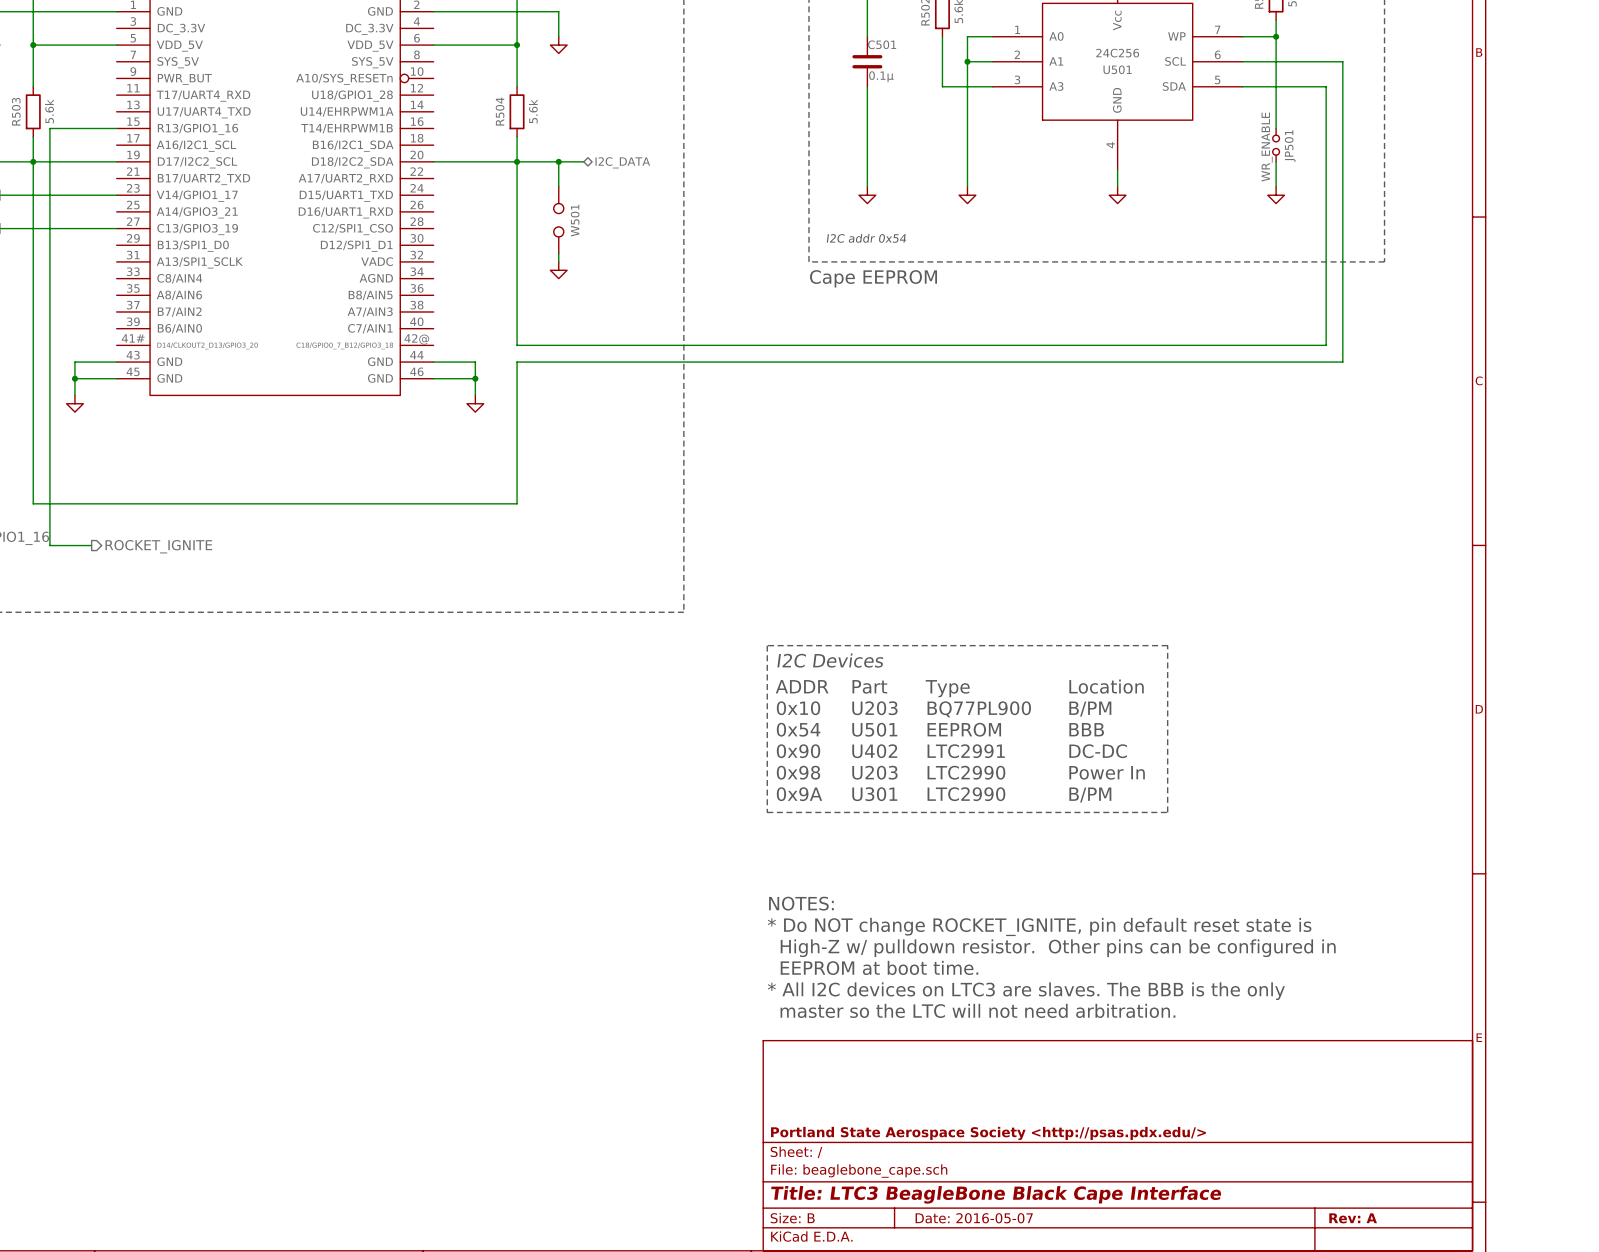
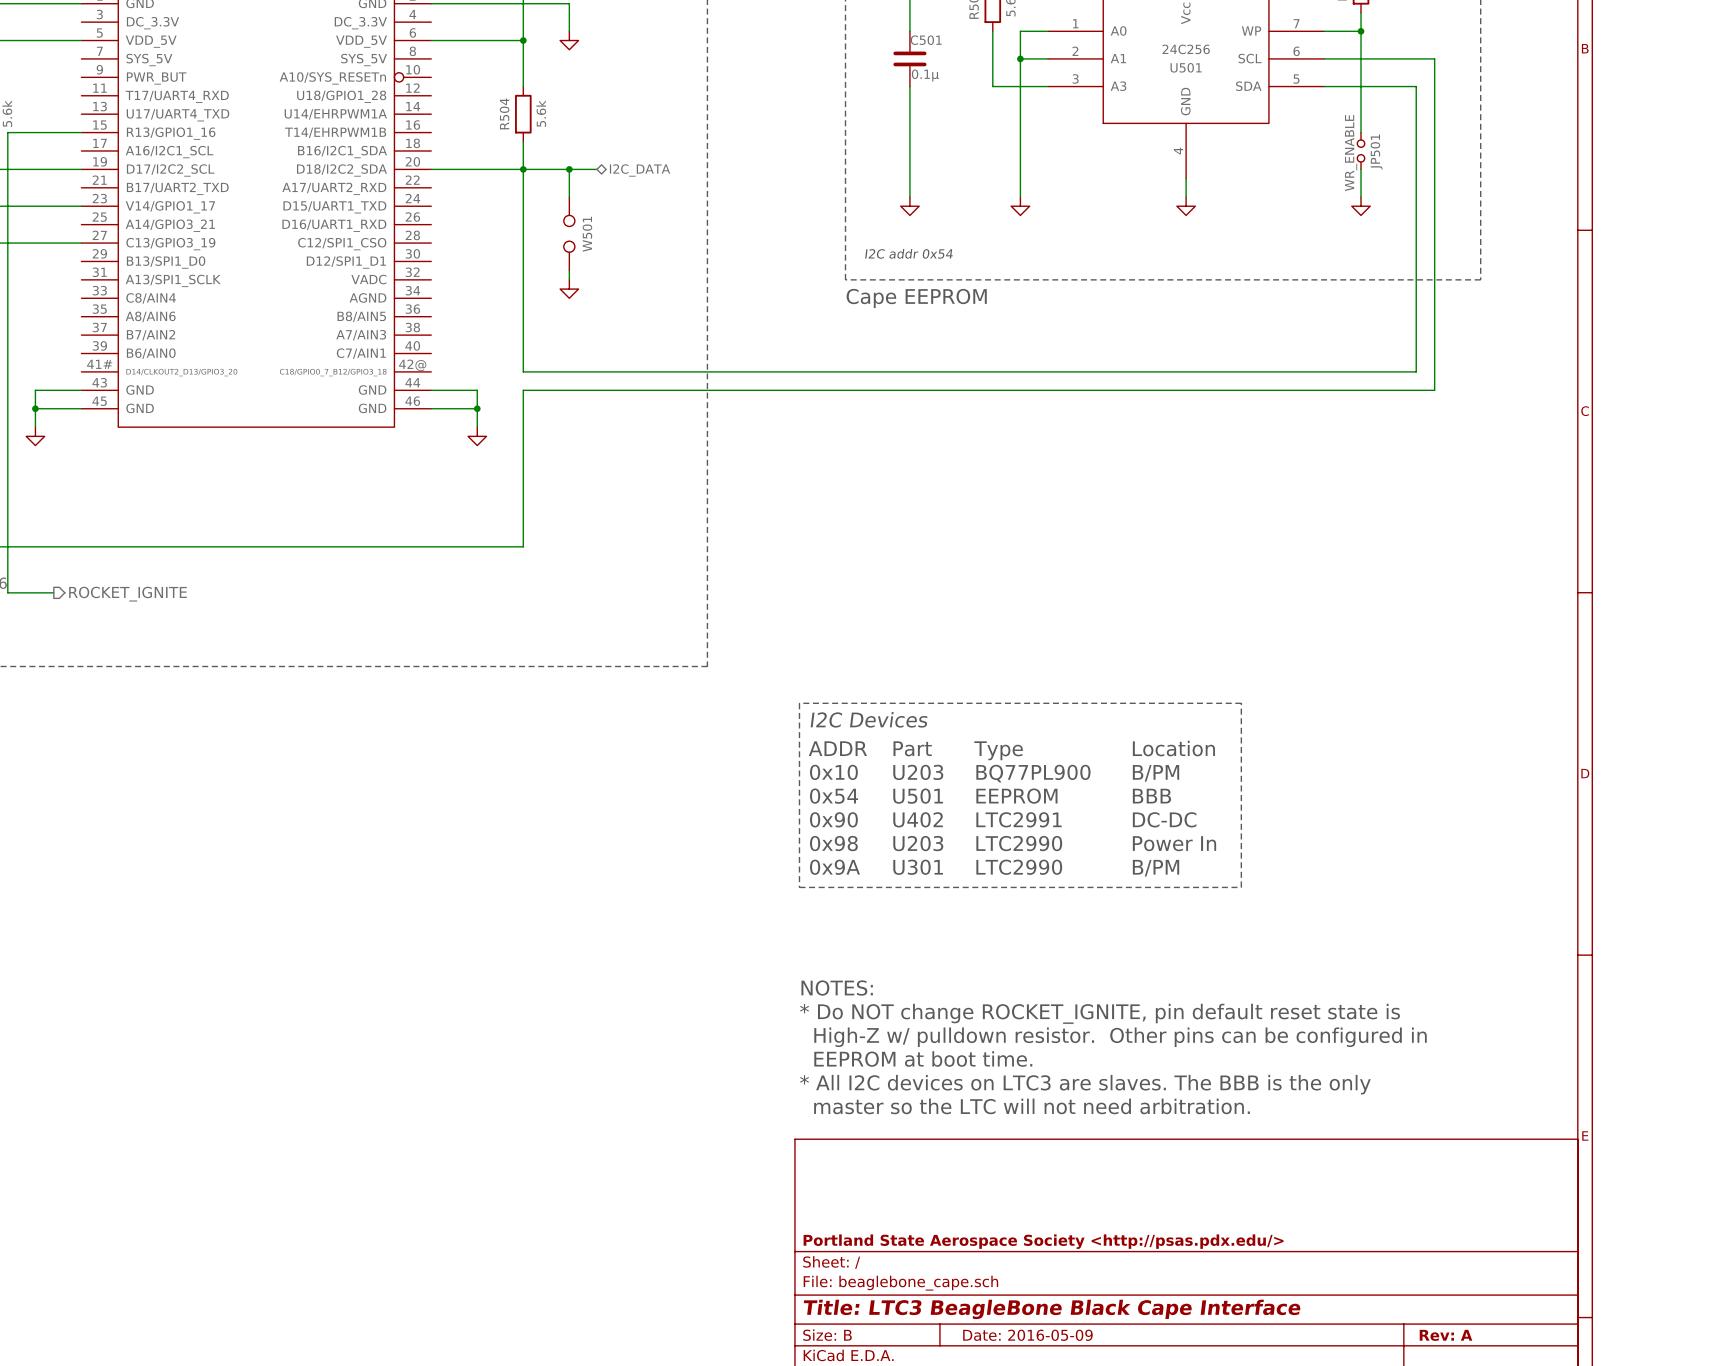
title block: Date: 2016-05-07 (974, 1218) -> Date: 2016-05-09 (1027, 1335)

